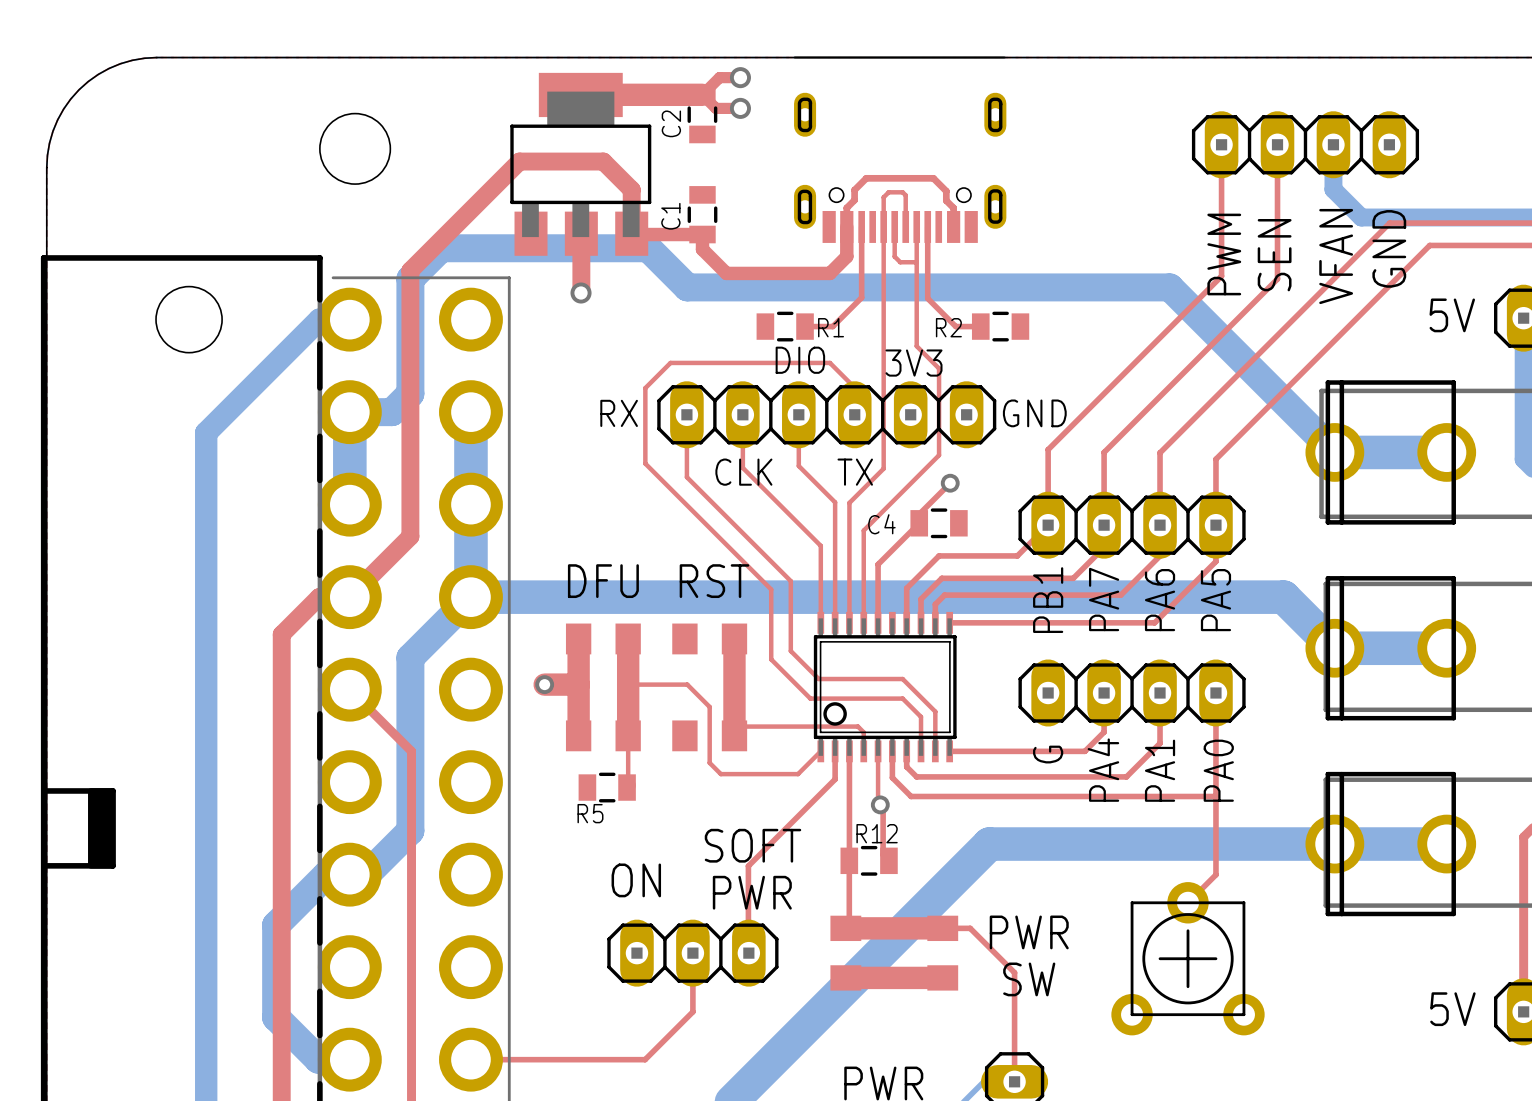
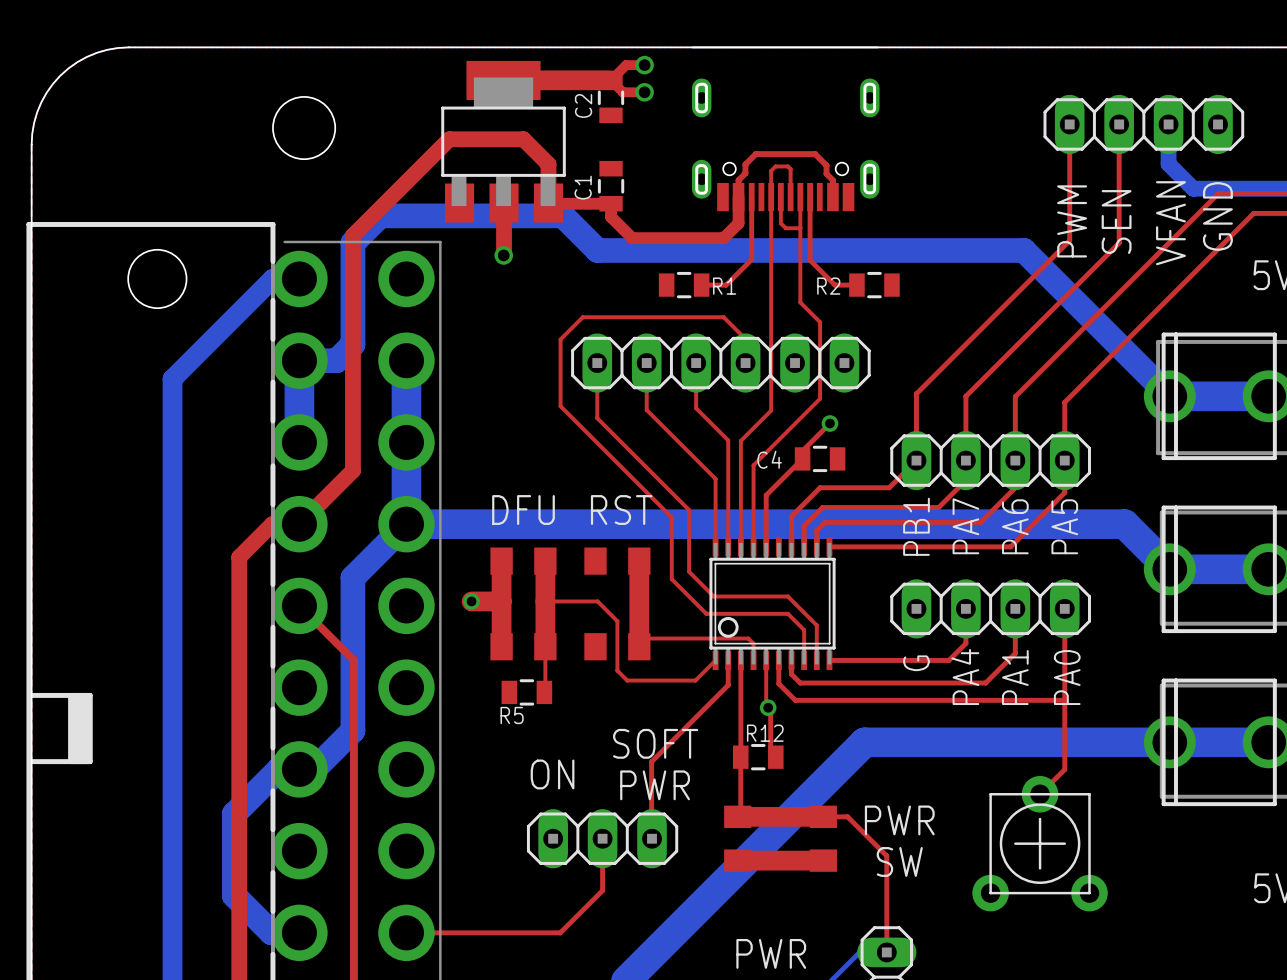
text: DIO (800, 360) -> none
text: 3V3 (913, 363) -> none
text: RX (619, 413) -> none
text: GND (1034, 413) -> none
text: CLK (743, 472) -> none
text: TX (855, 472) -> none

